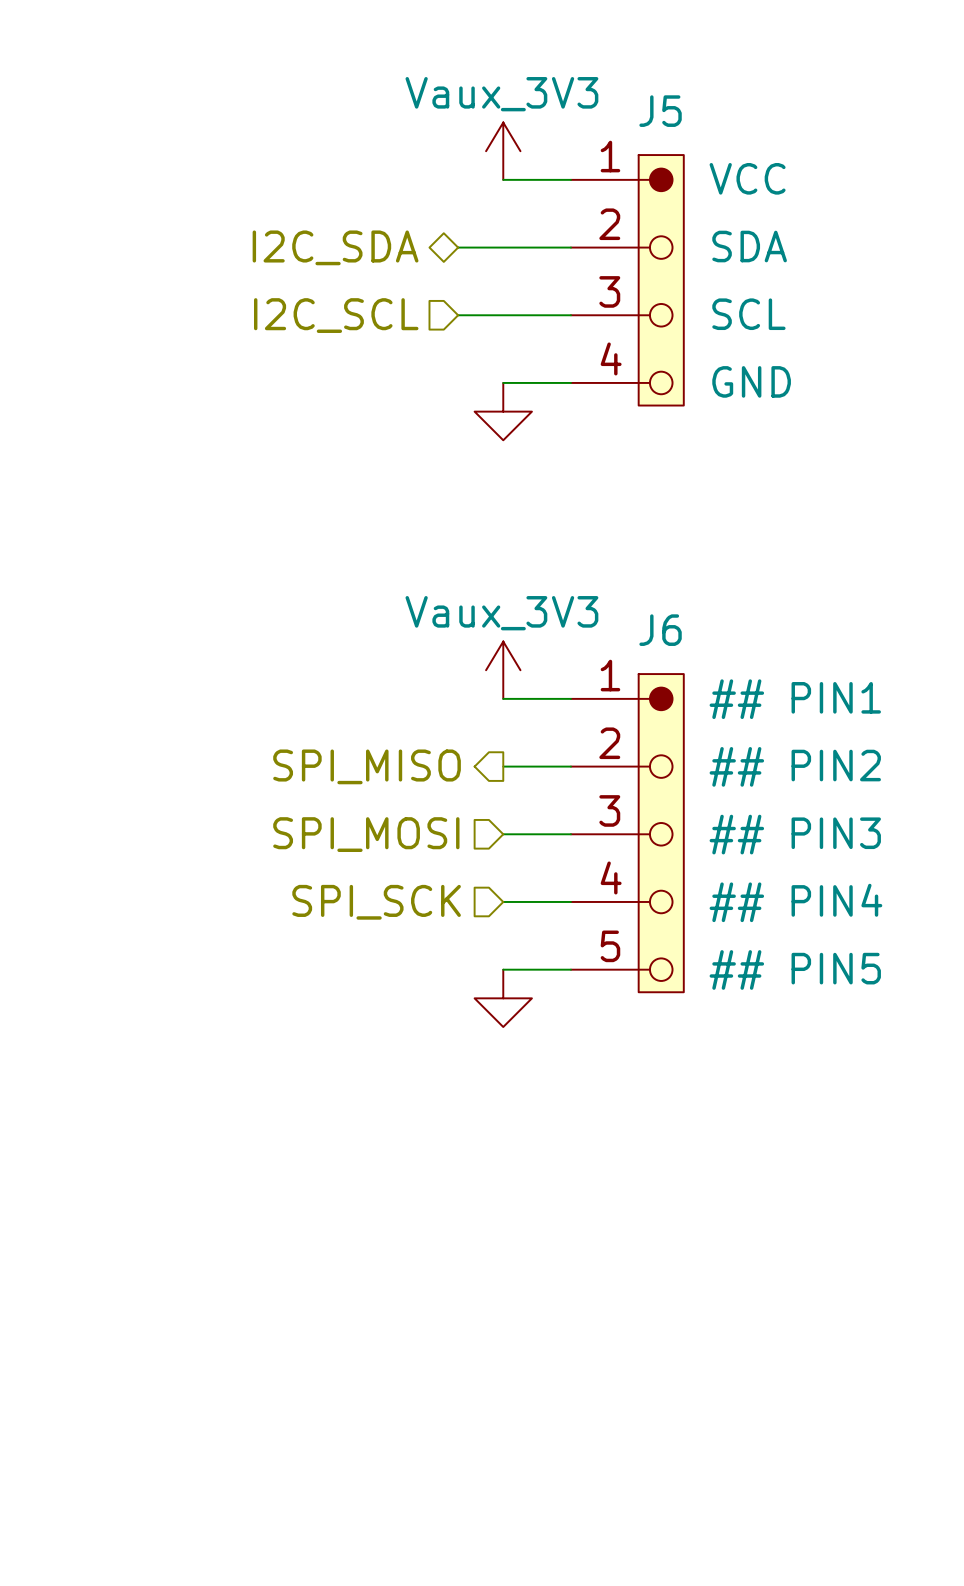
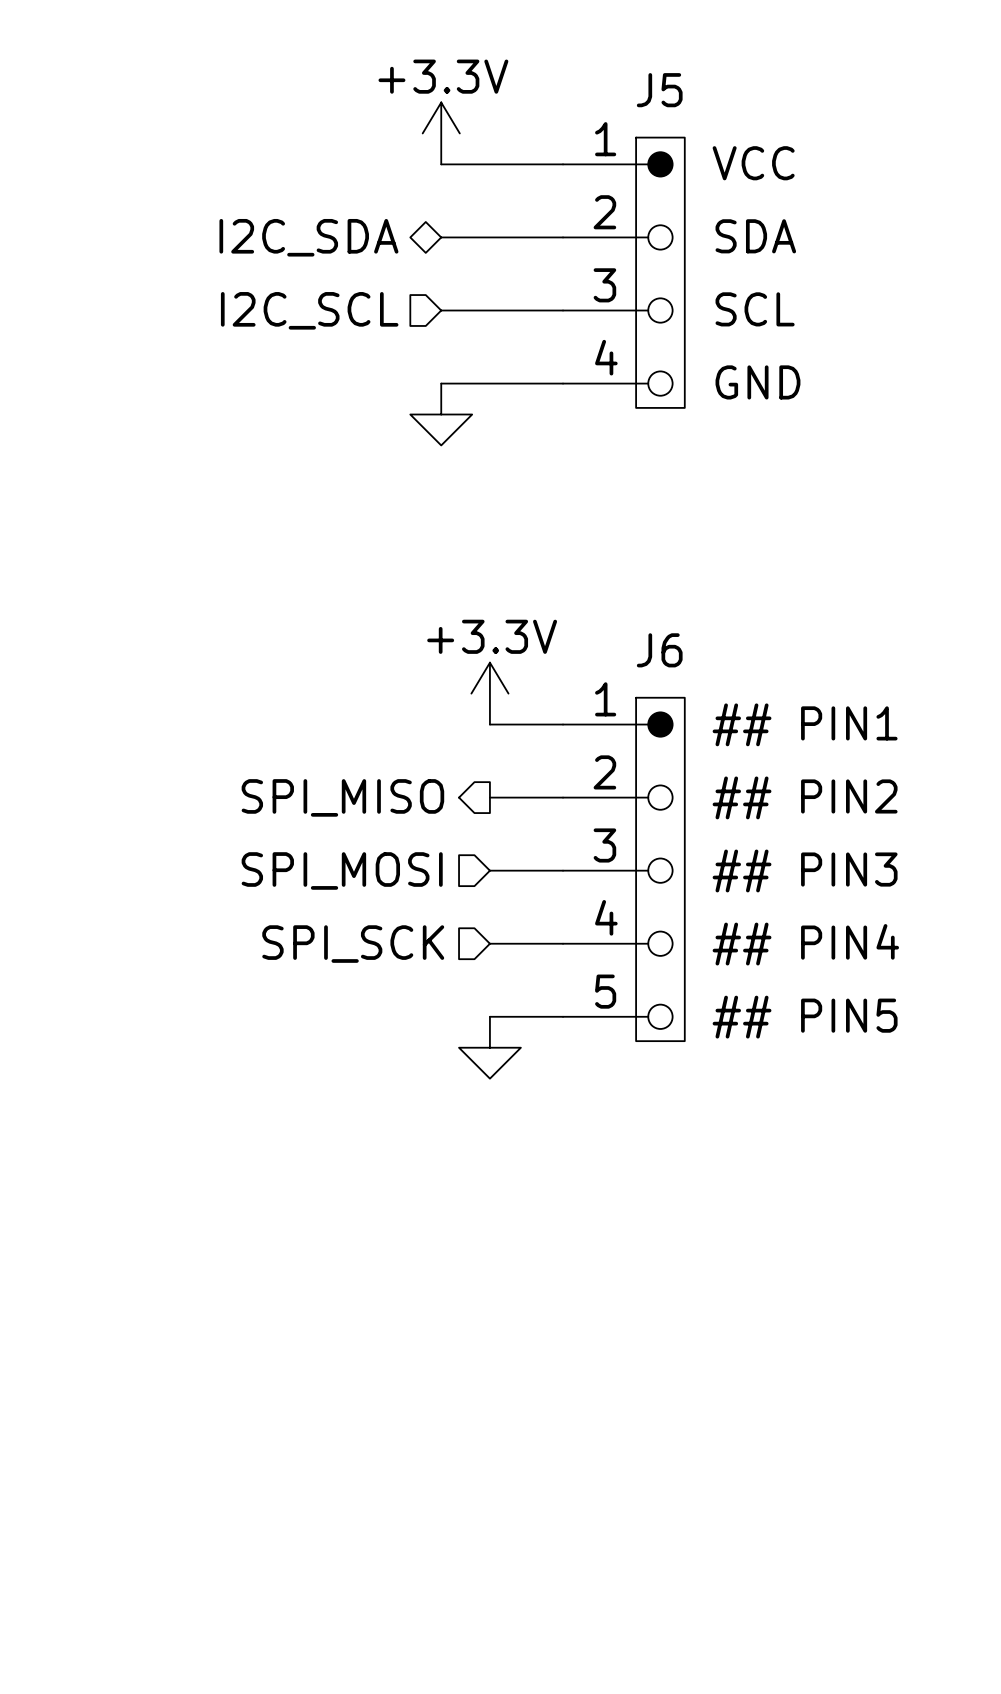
power symbol: none -> +3.3V (441, 133)
power symbol: Vaux_3V3 (503, 151) -> none
wire: none -> (441, 164) (489, 164)
wire: none -> (441, 383) (489, 383)
power symbol position: (503, 411) -> (441, 414)
power symbol: Vaux_3V3 (503, 670) -> +3.3V (489, 693)

